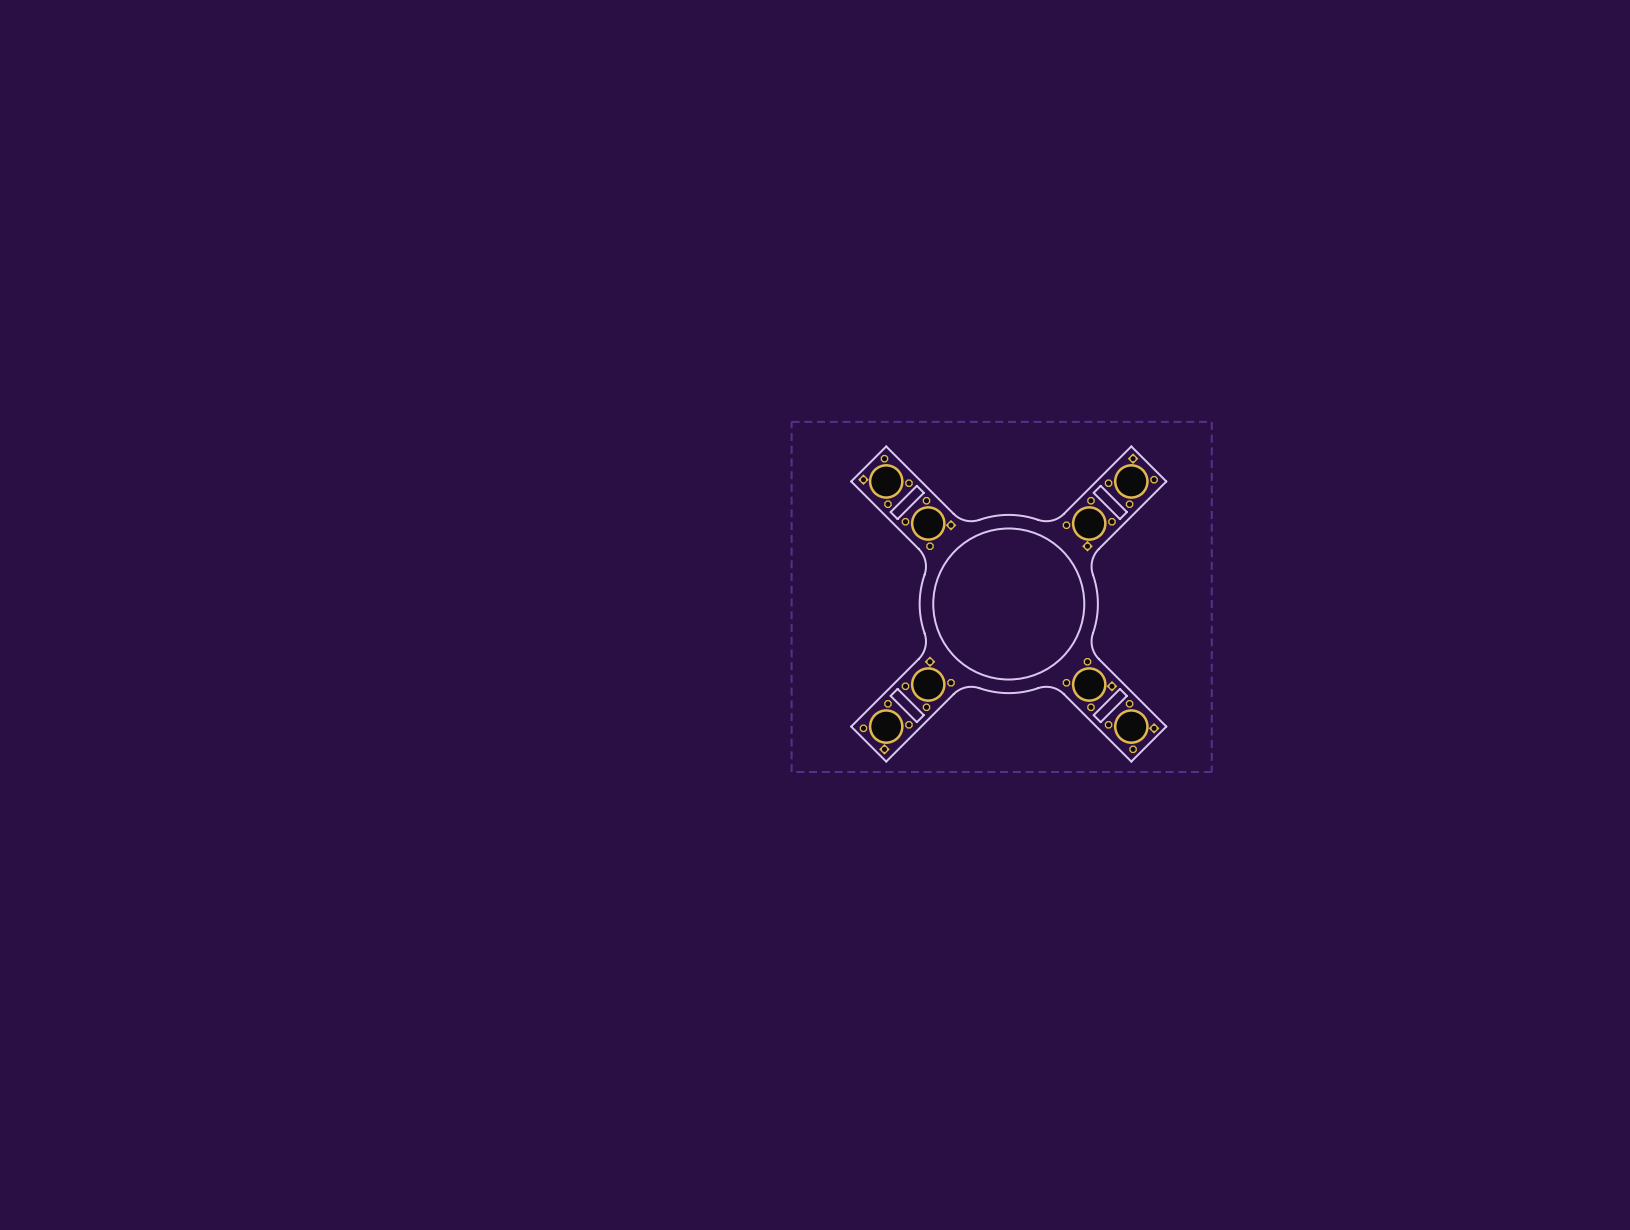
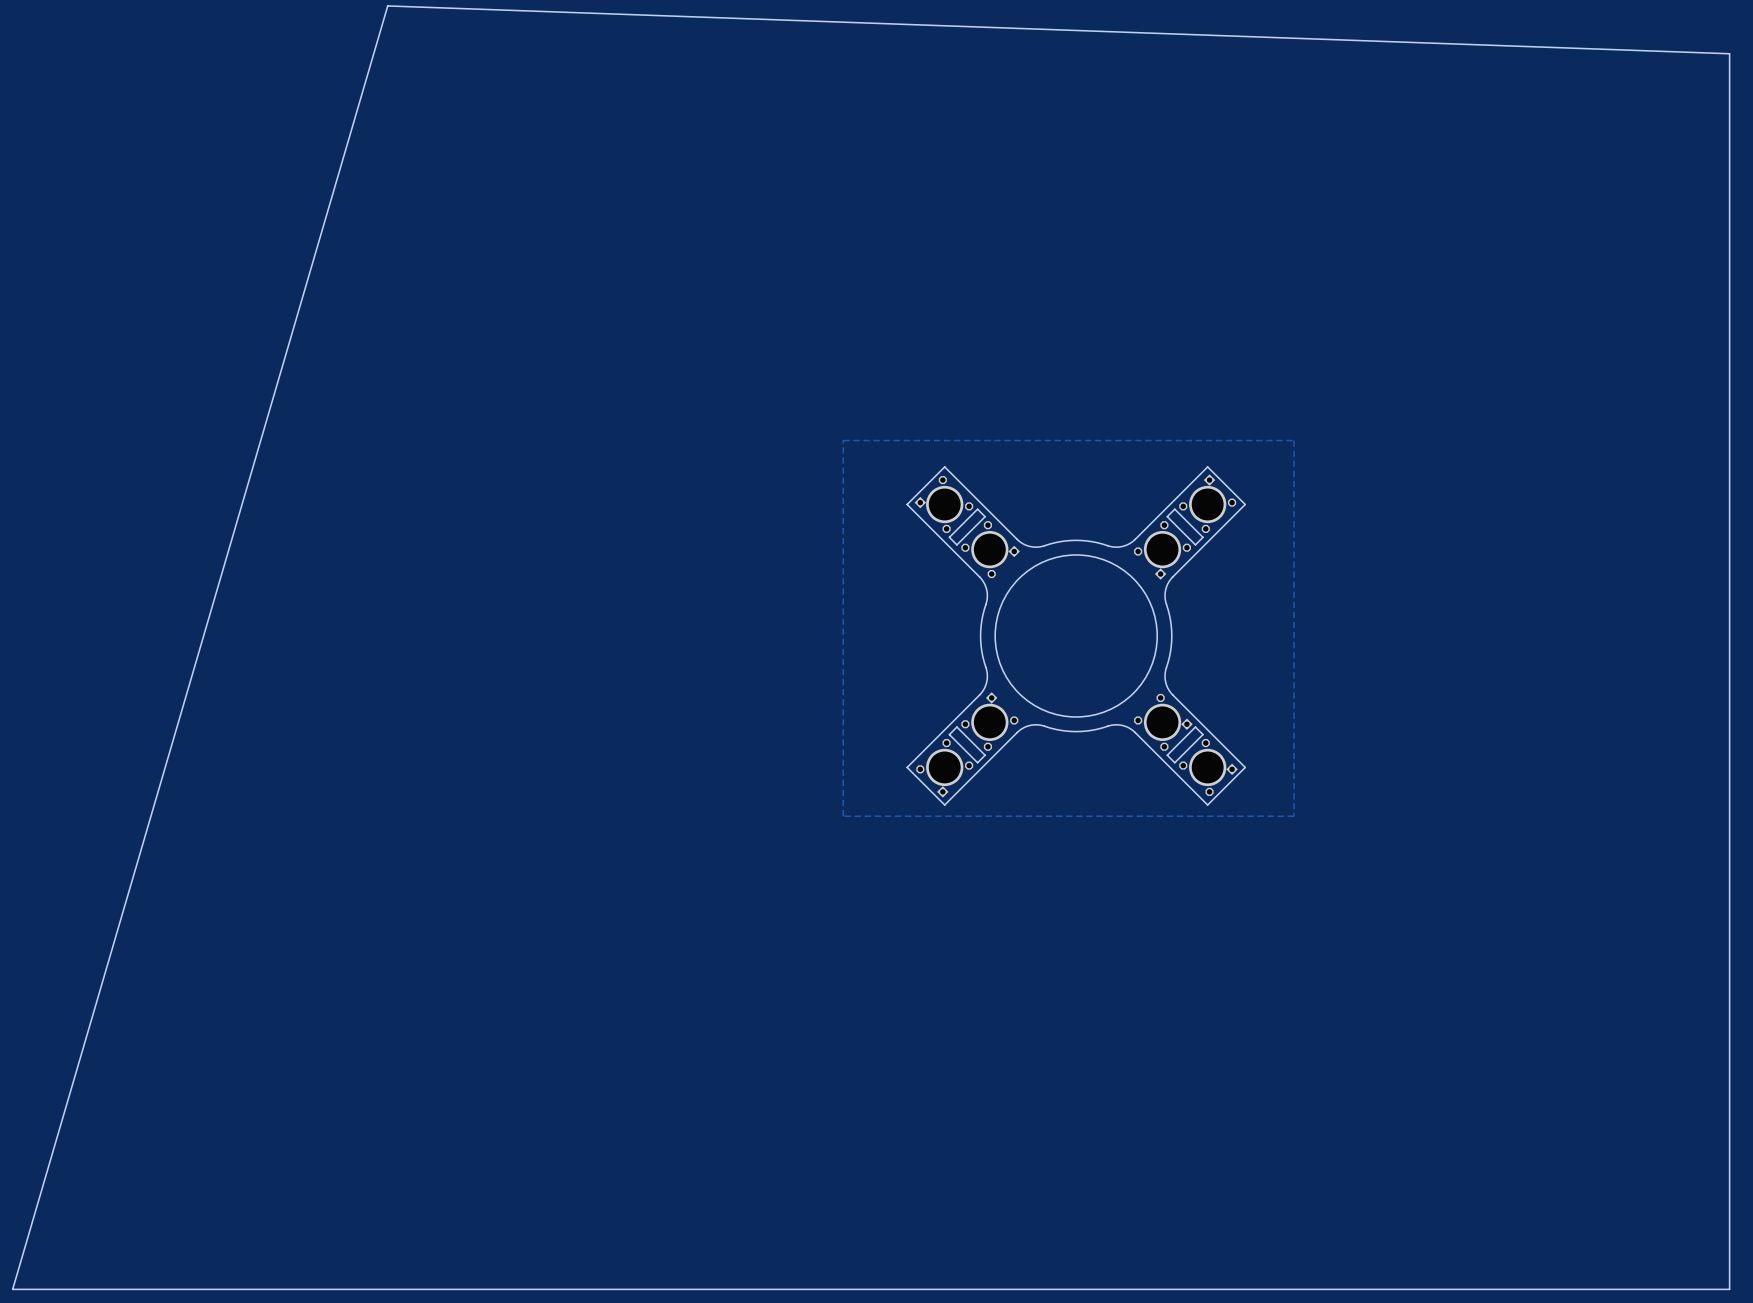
board edge: none -> (387, 5) (12, 1289) (1729, 1289) (1729, 53) (387, 5)

